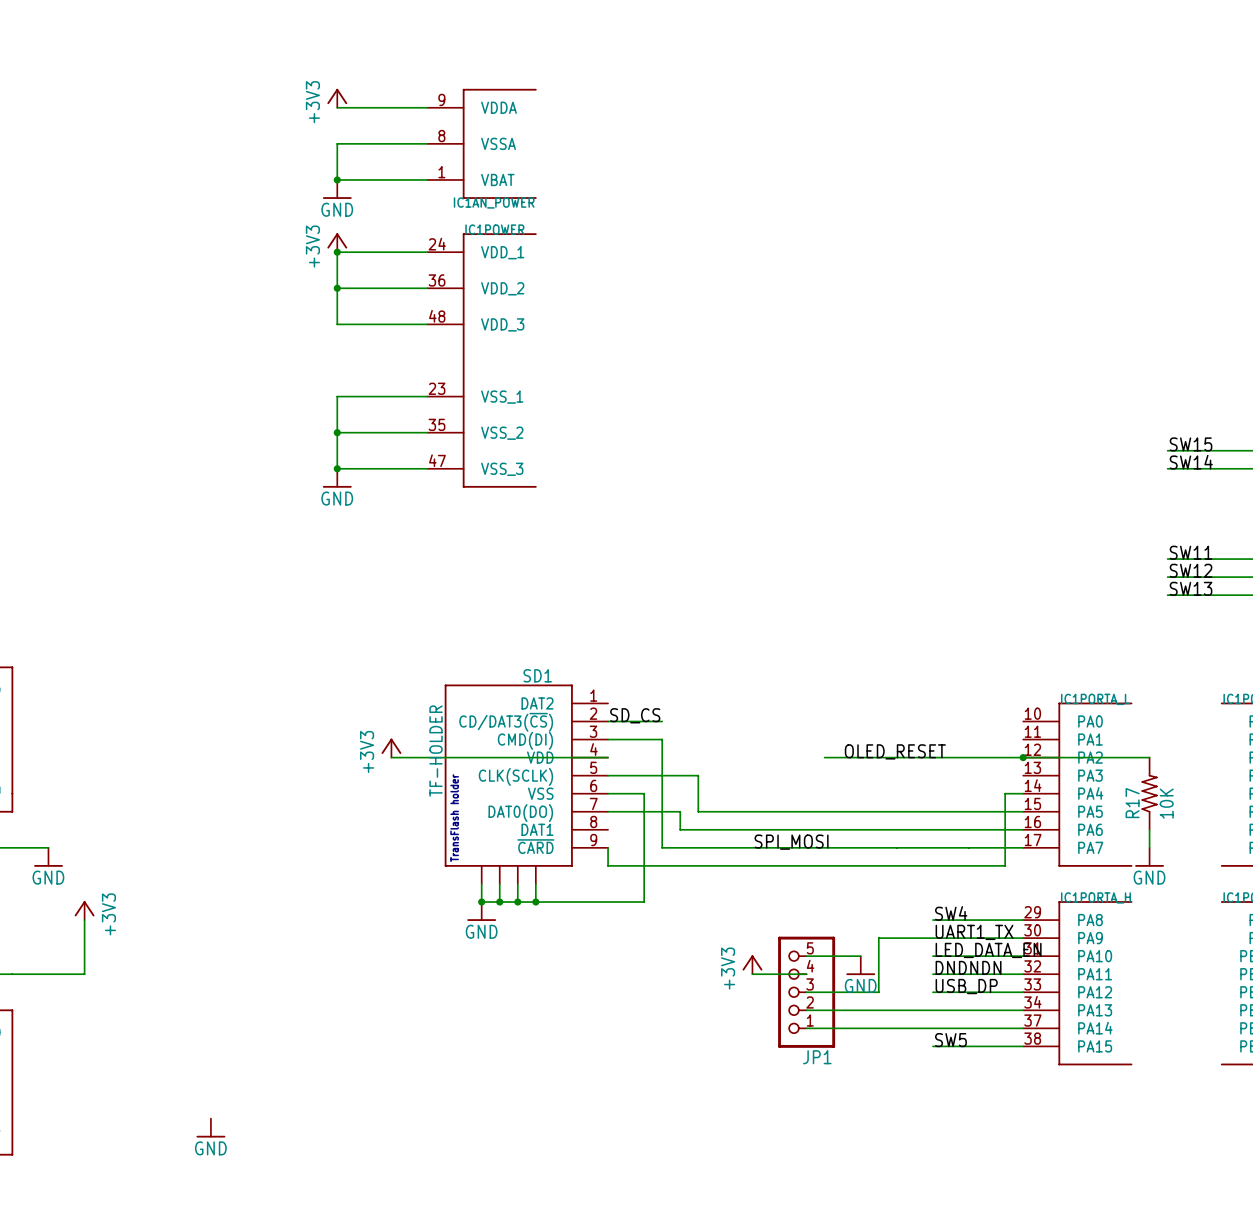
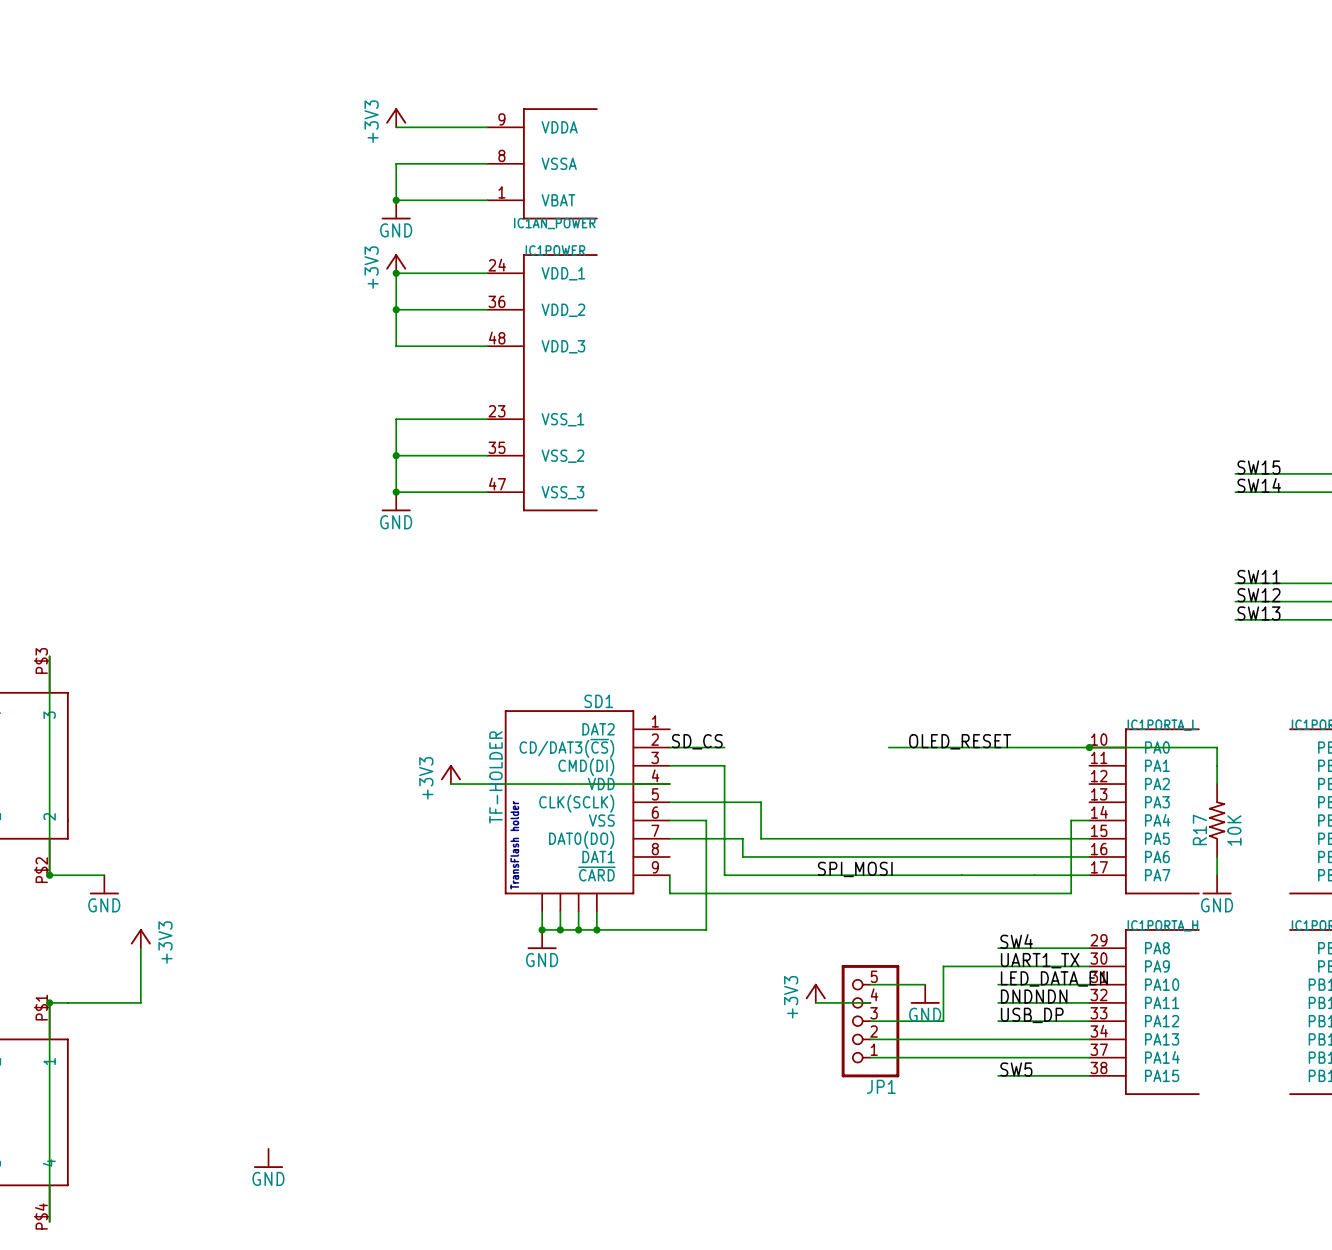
label position: OLED_RESET (895, 751) -> OLED_RESET (960, 741)
wire: (824, 757) (1149, 757) -> (888, 747) (1217, 747) (1217, 784)
junction position: (1023, 757) -> (1089, 747)

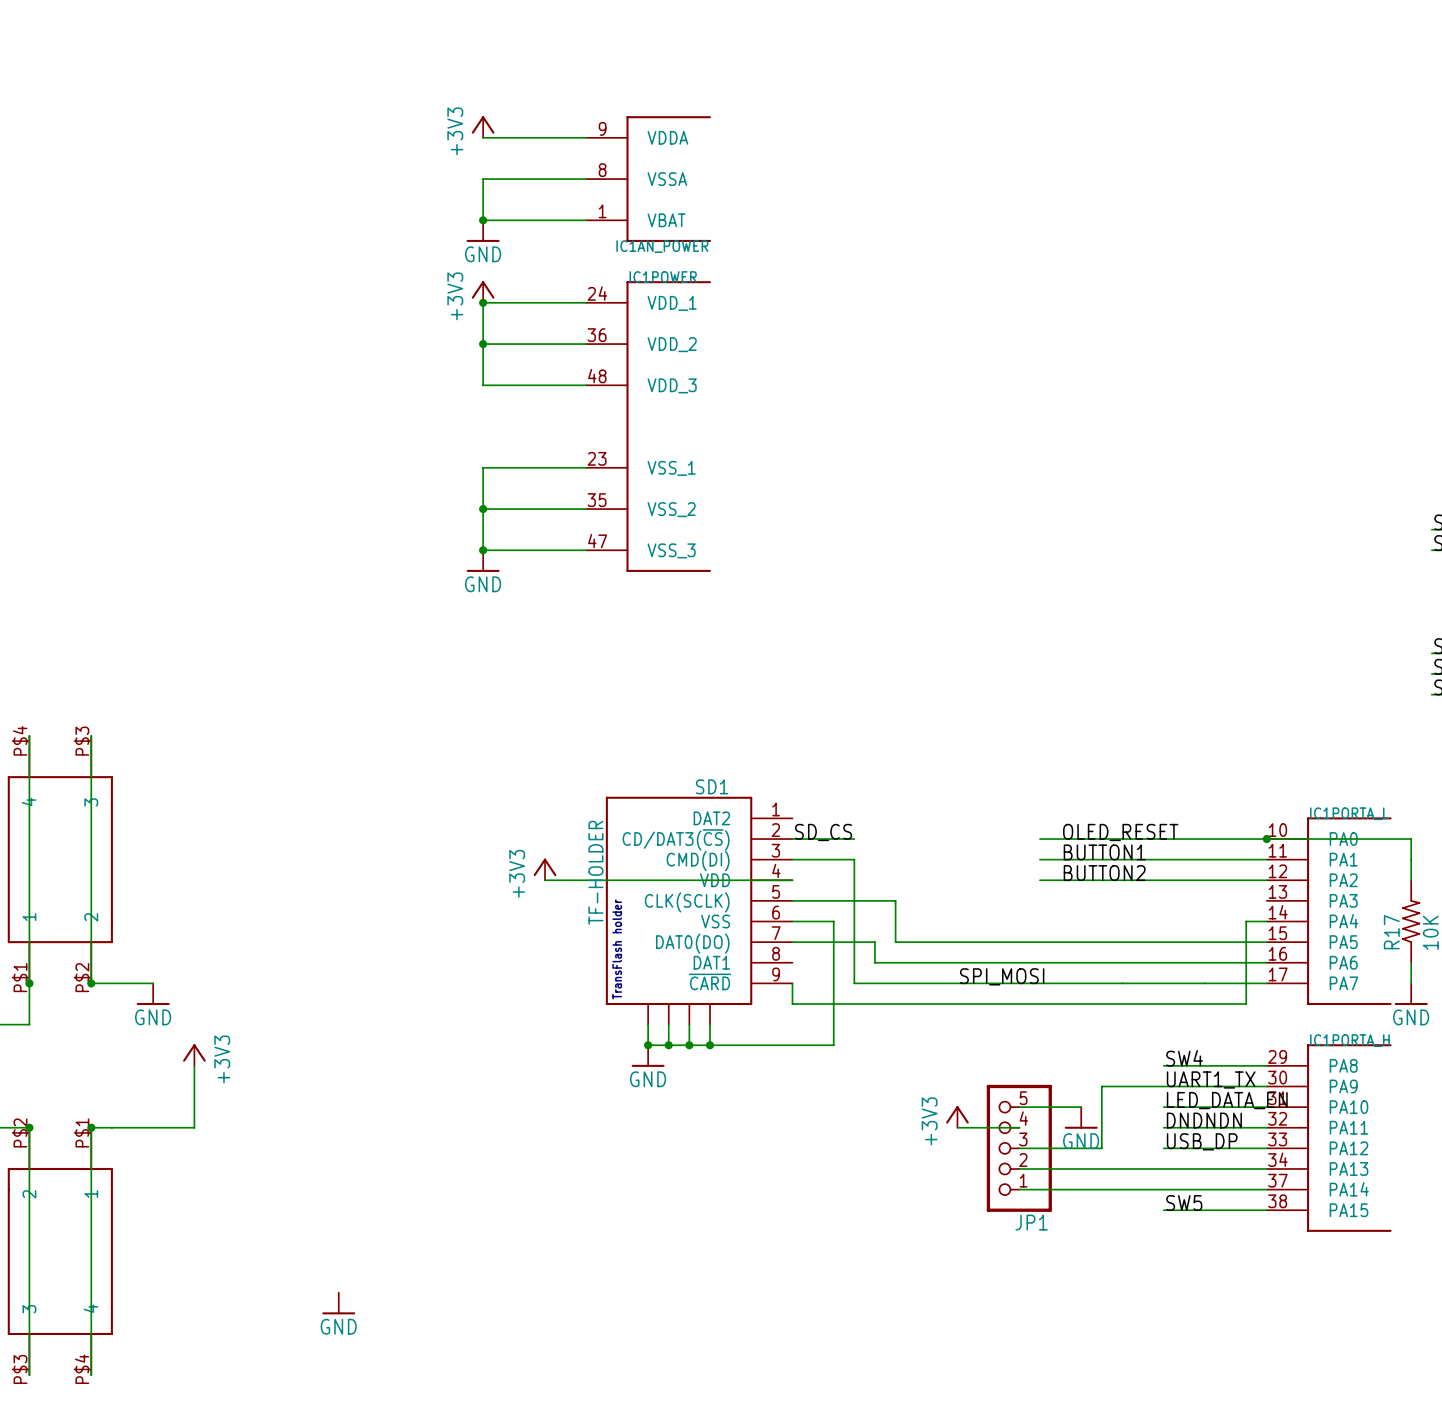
label: none -> BUTTON1 (1104, 852)
wire: none -> (1039, 859) (1266, 859)
label: none -> BUTTON2 (1104, 873)
wire: none -> (1039, 880) (1266, 880)

